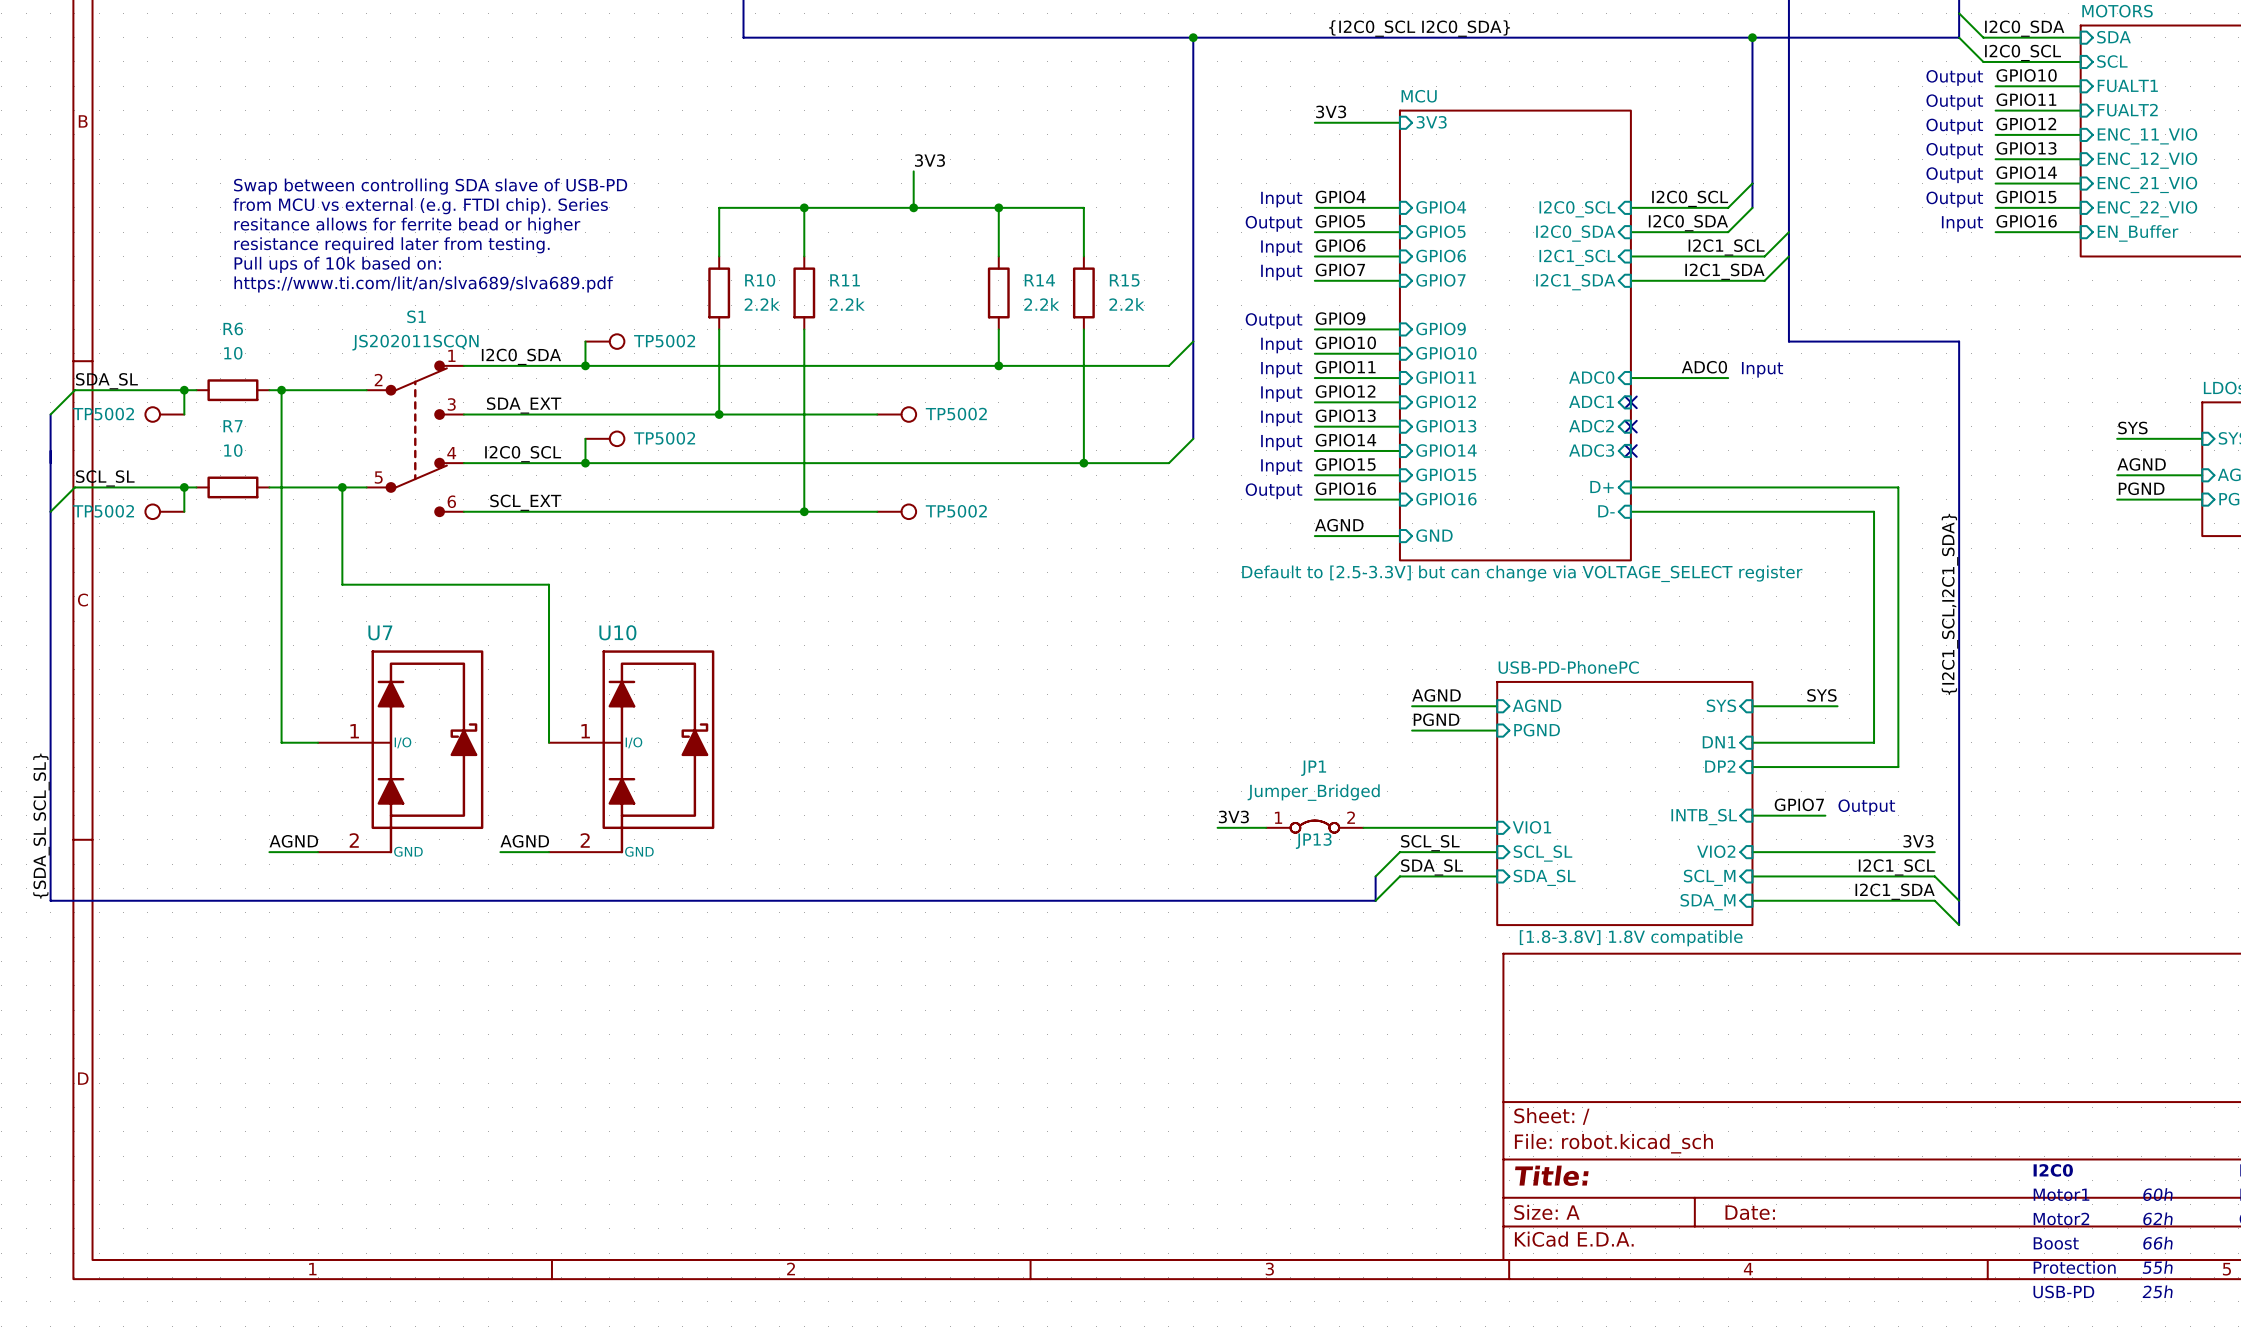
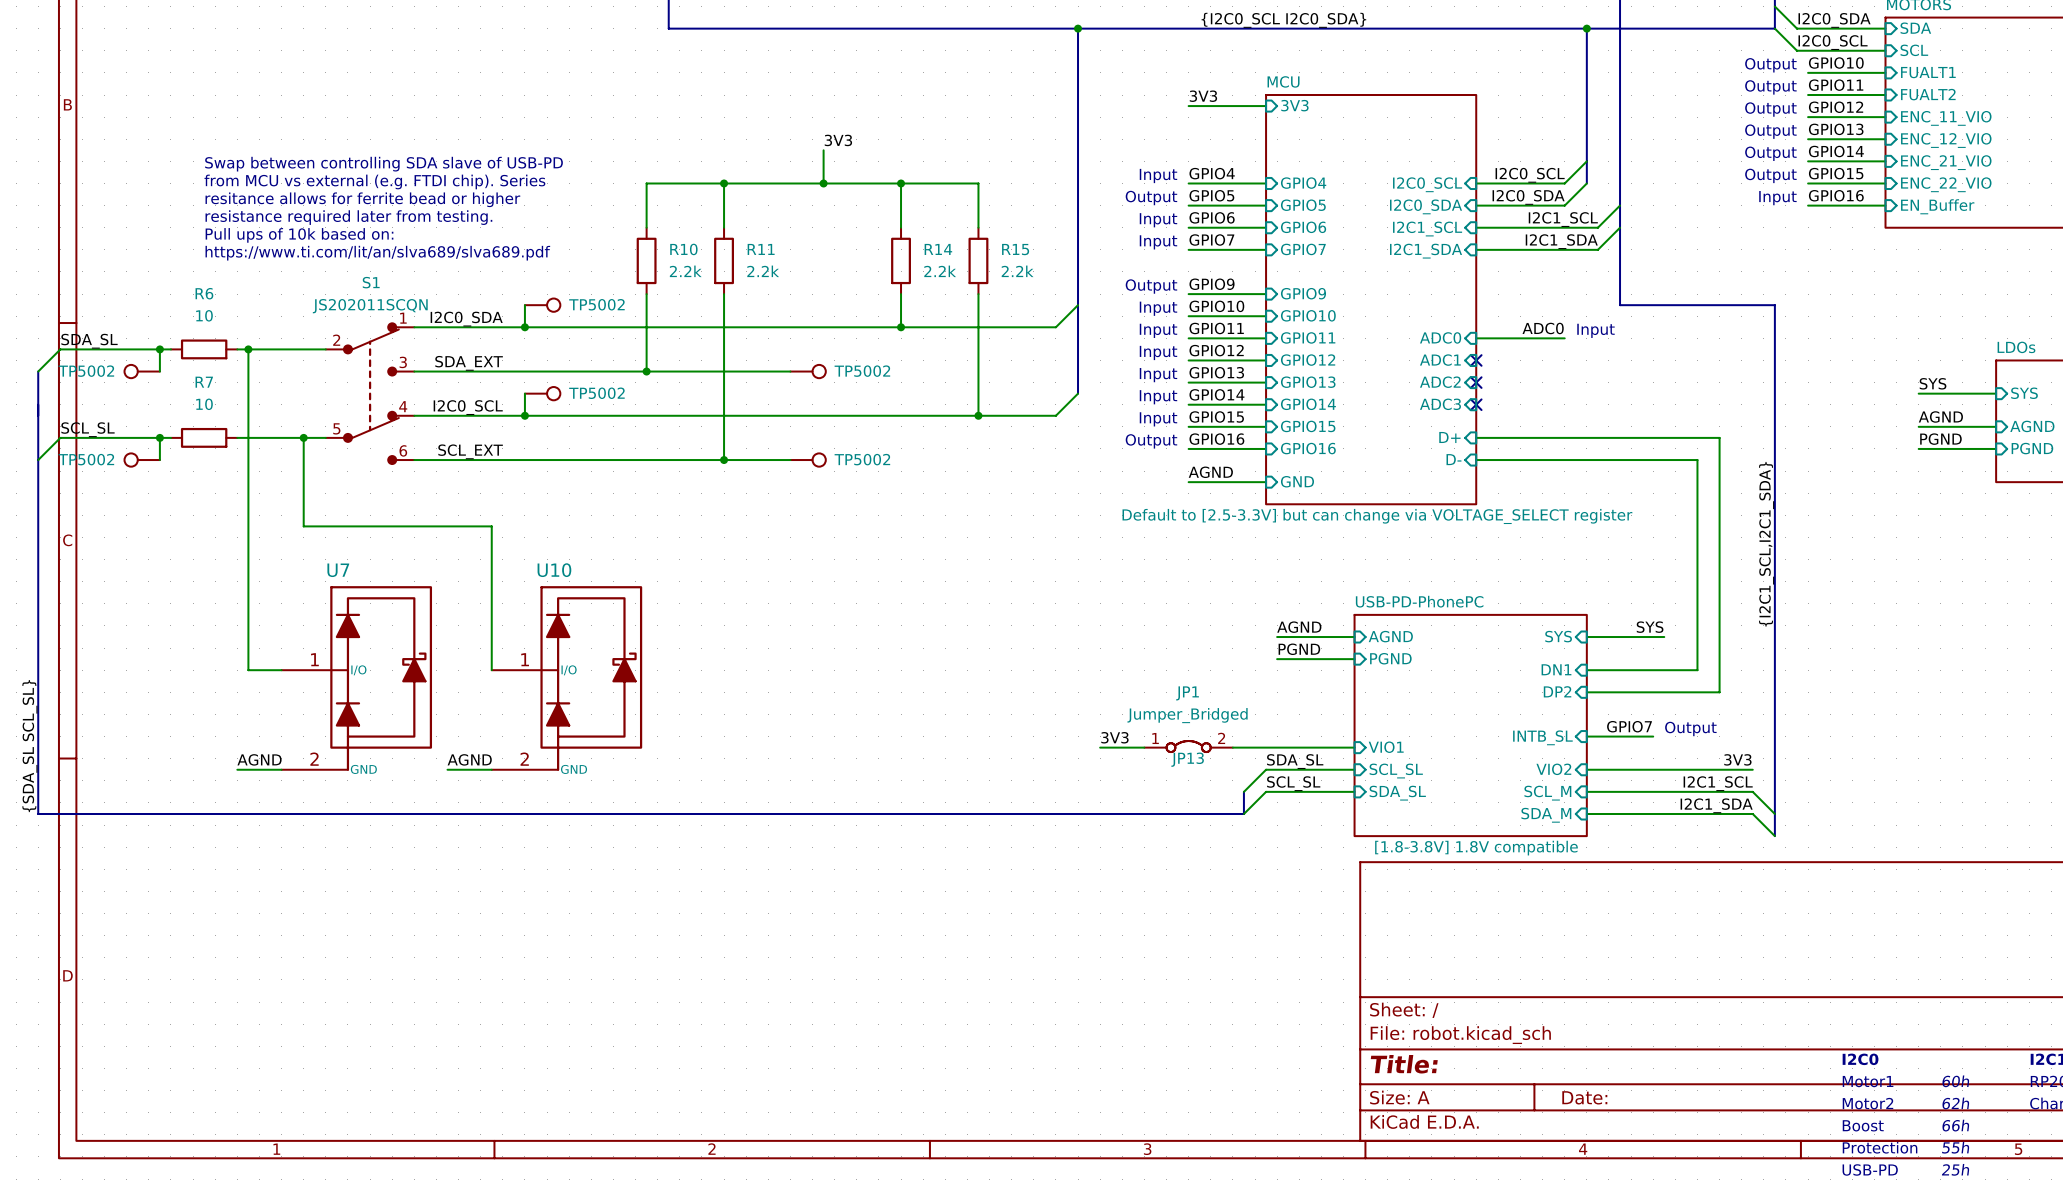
label: SCL_SL (1430, 843) -> SDA_SL (1295, 761)
label: SDA_SL (1431, 867) -> SCL_SL (1293, 783)

